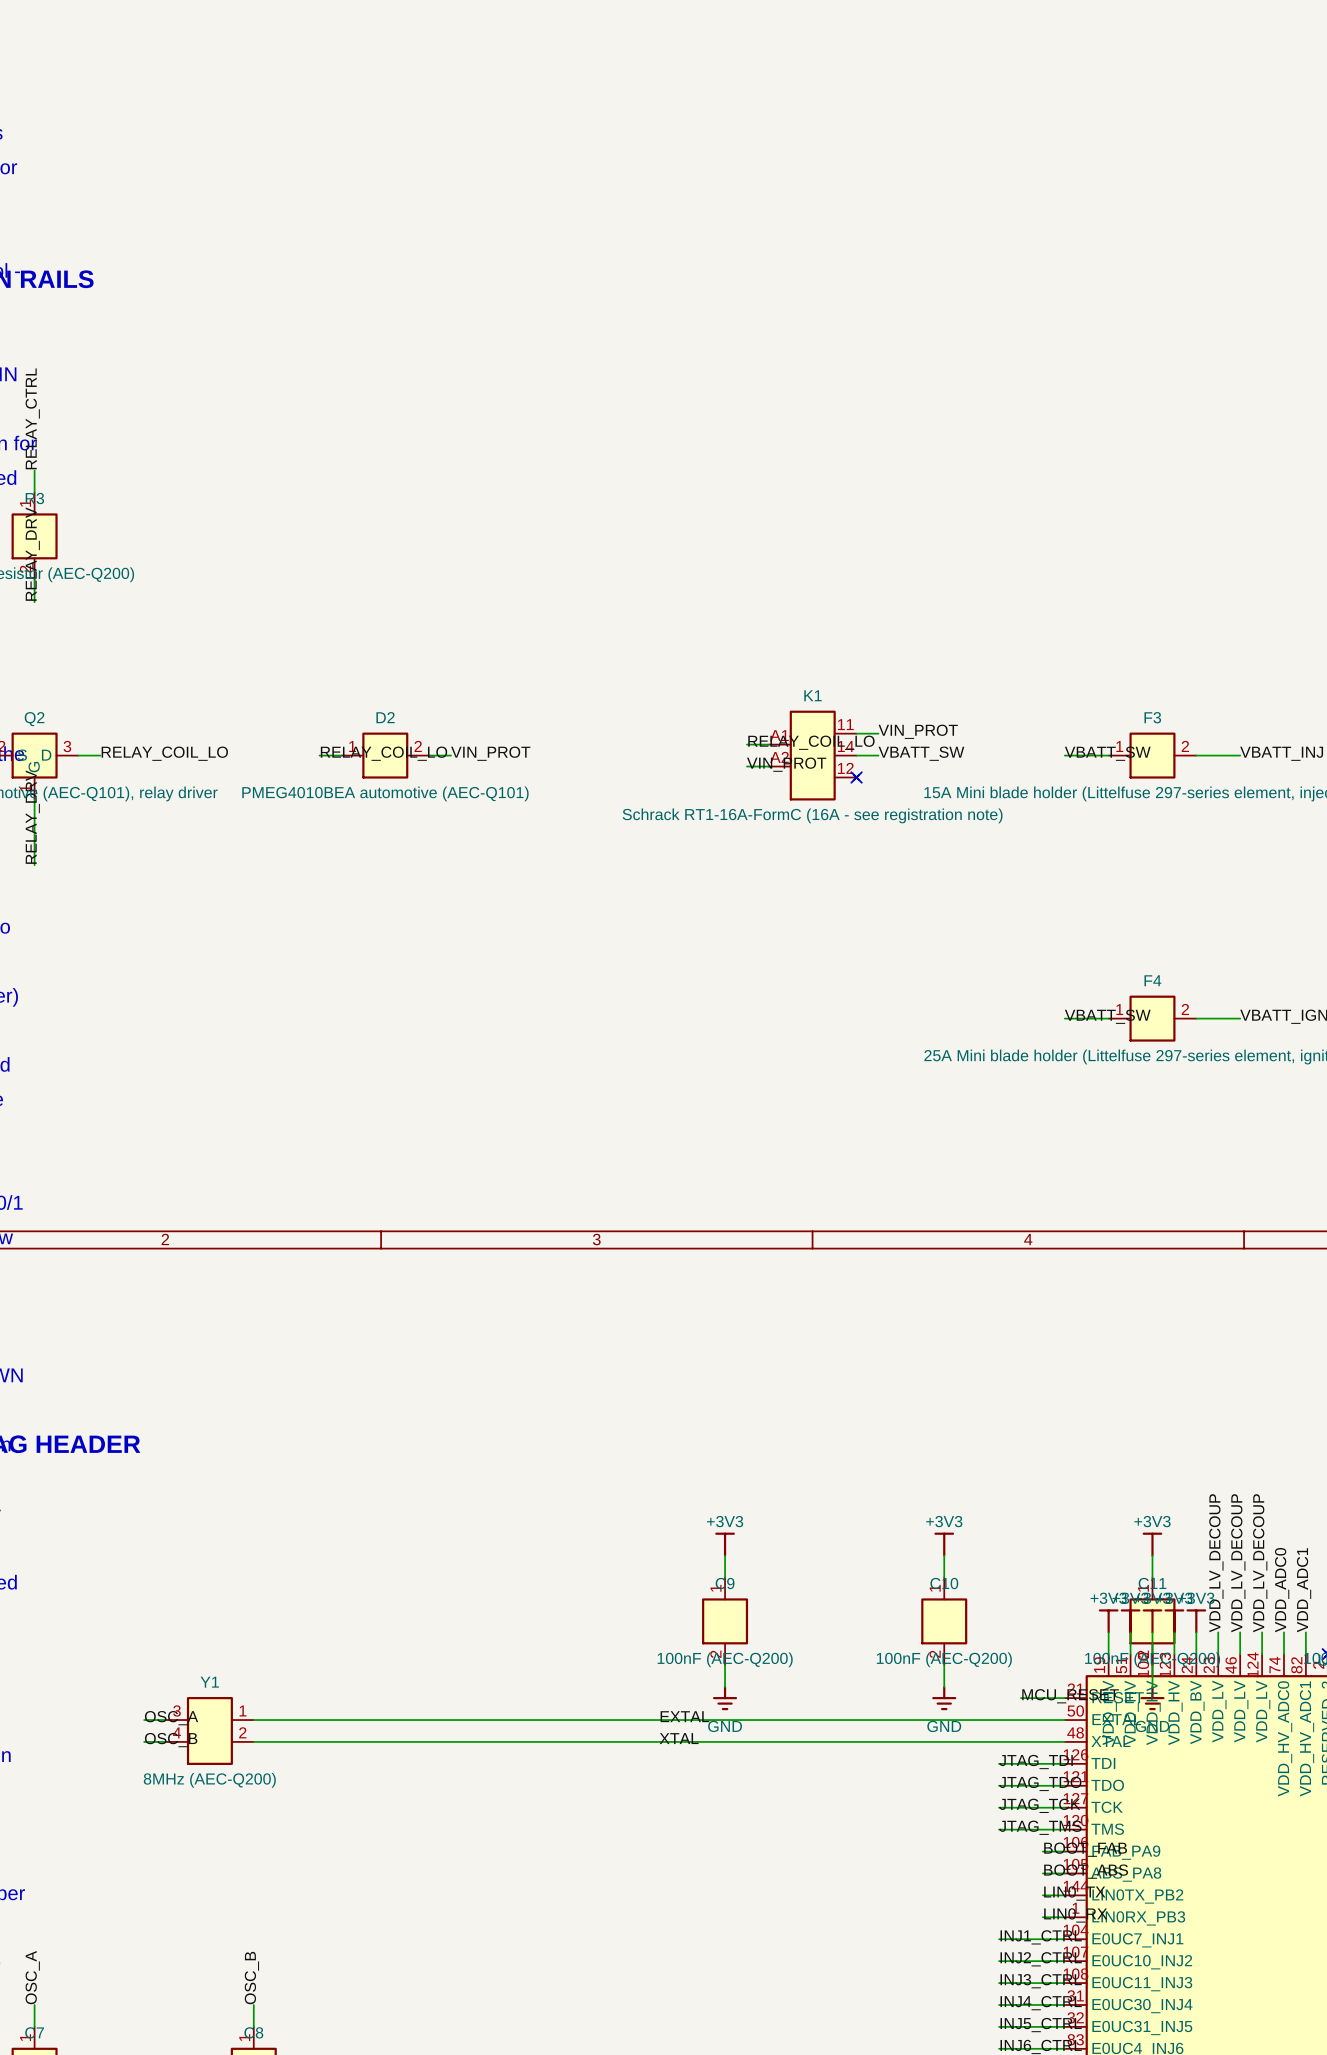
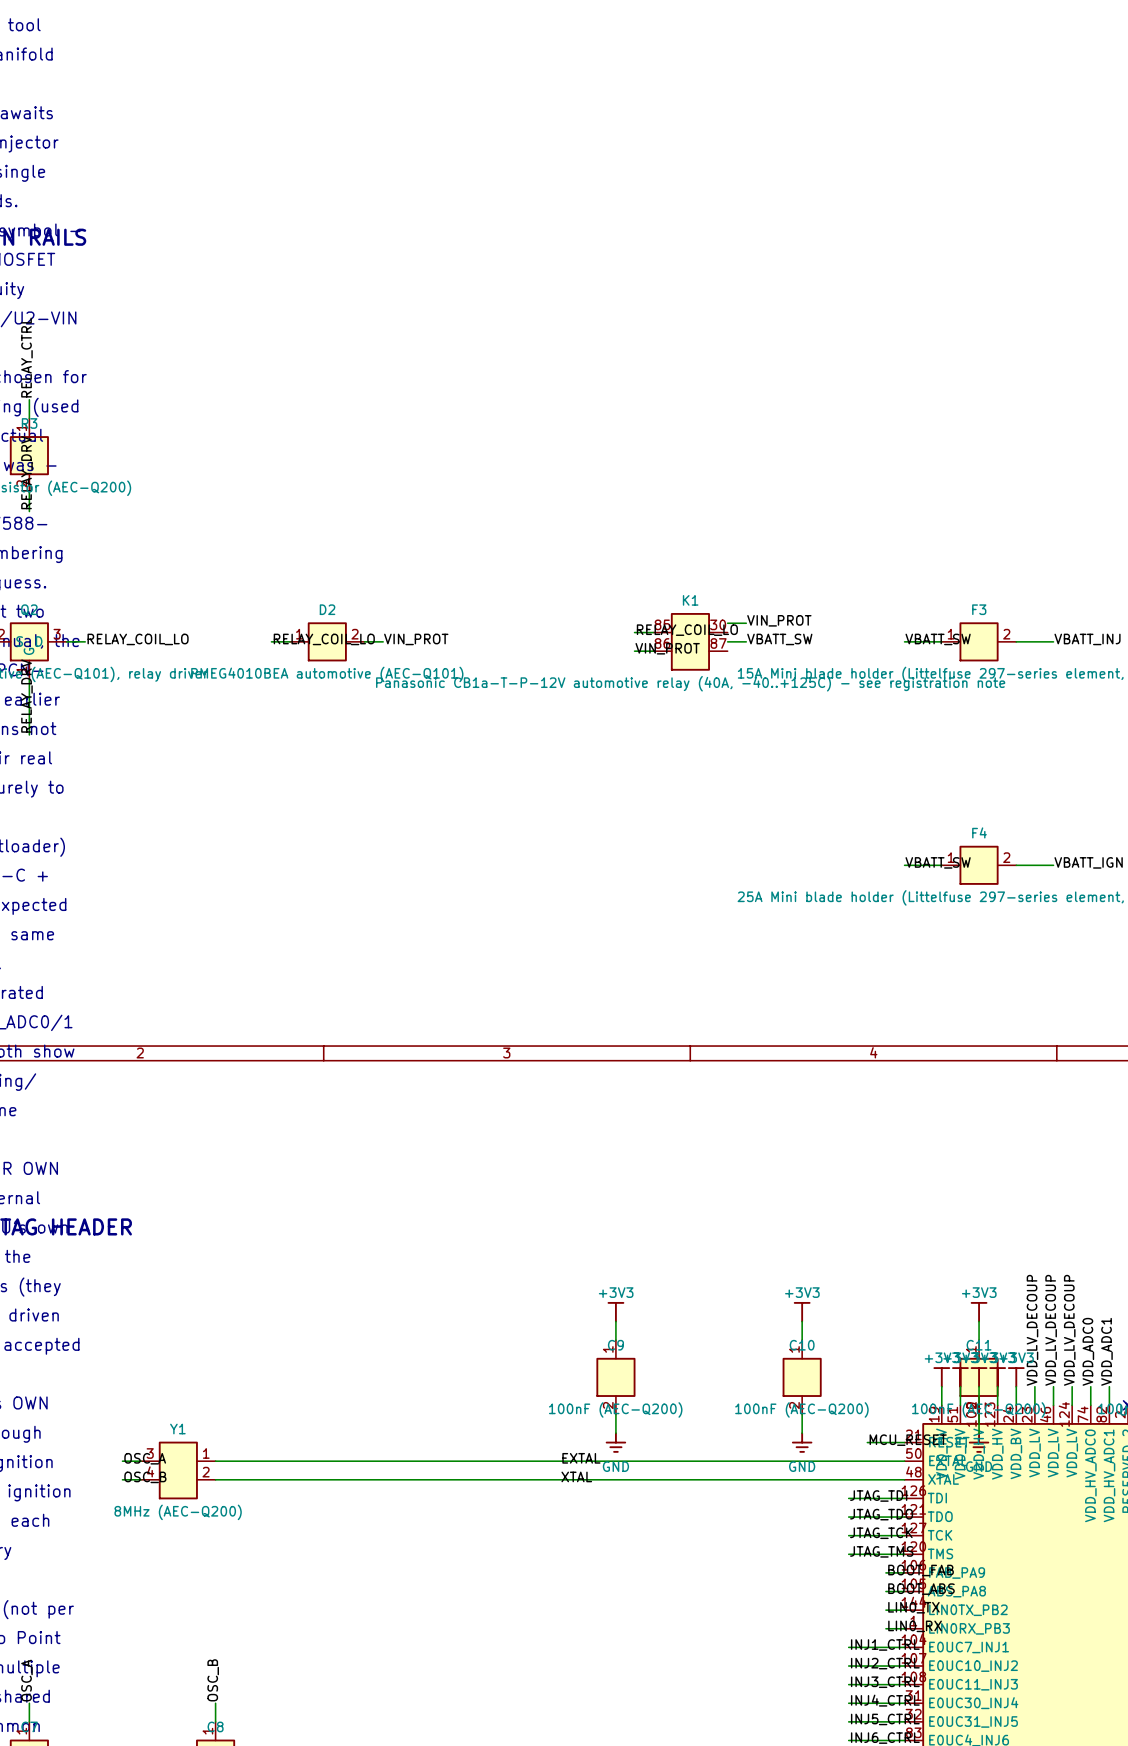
K1 symbol: [768, 710, 860, 801] -> [653, 613, 728, 671]
no-connect mark: (856, 777) -> none
K1 value: Schrack RT1-16A-FormC (16A - see registration note) (812, 815) -> Panasonic CB1a-T-P-12V automotive relay (40A, -40..+125C) - see registration note (690, 683)

